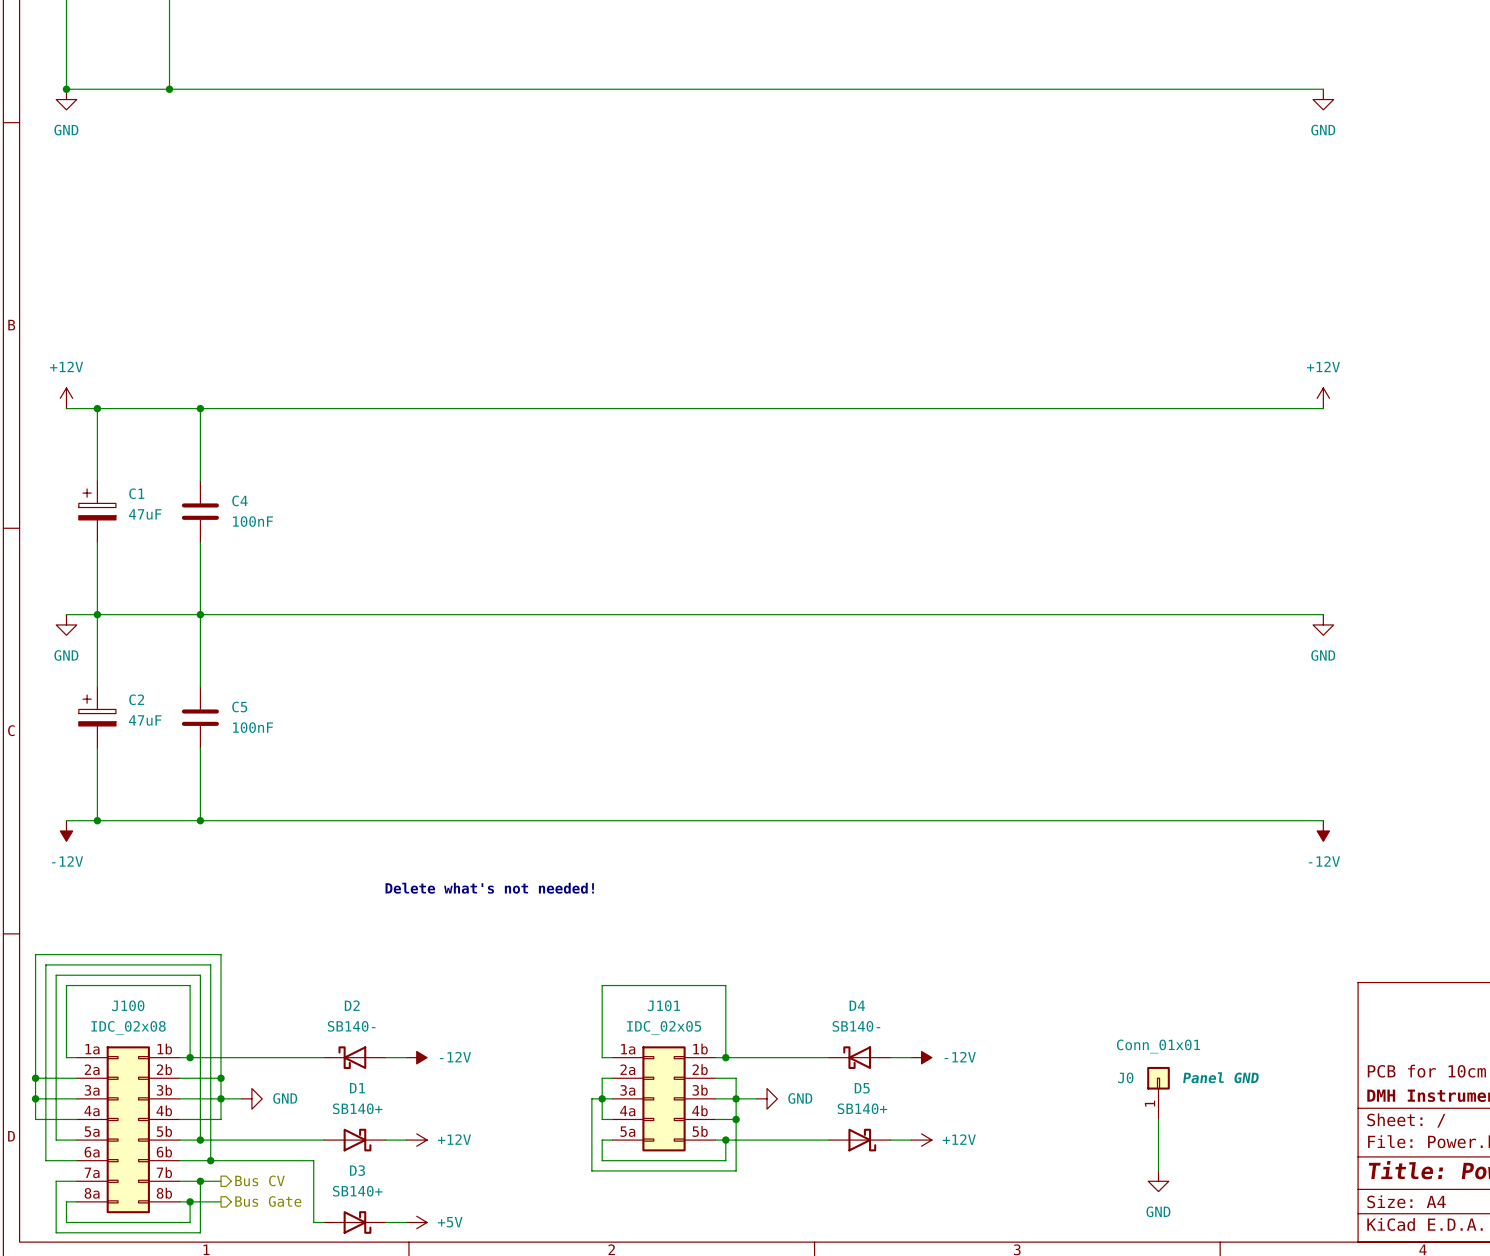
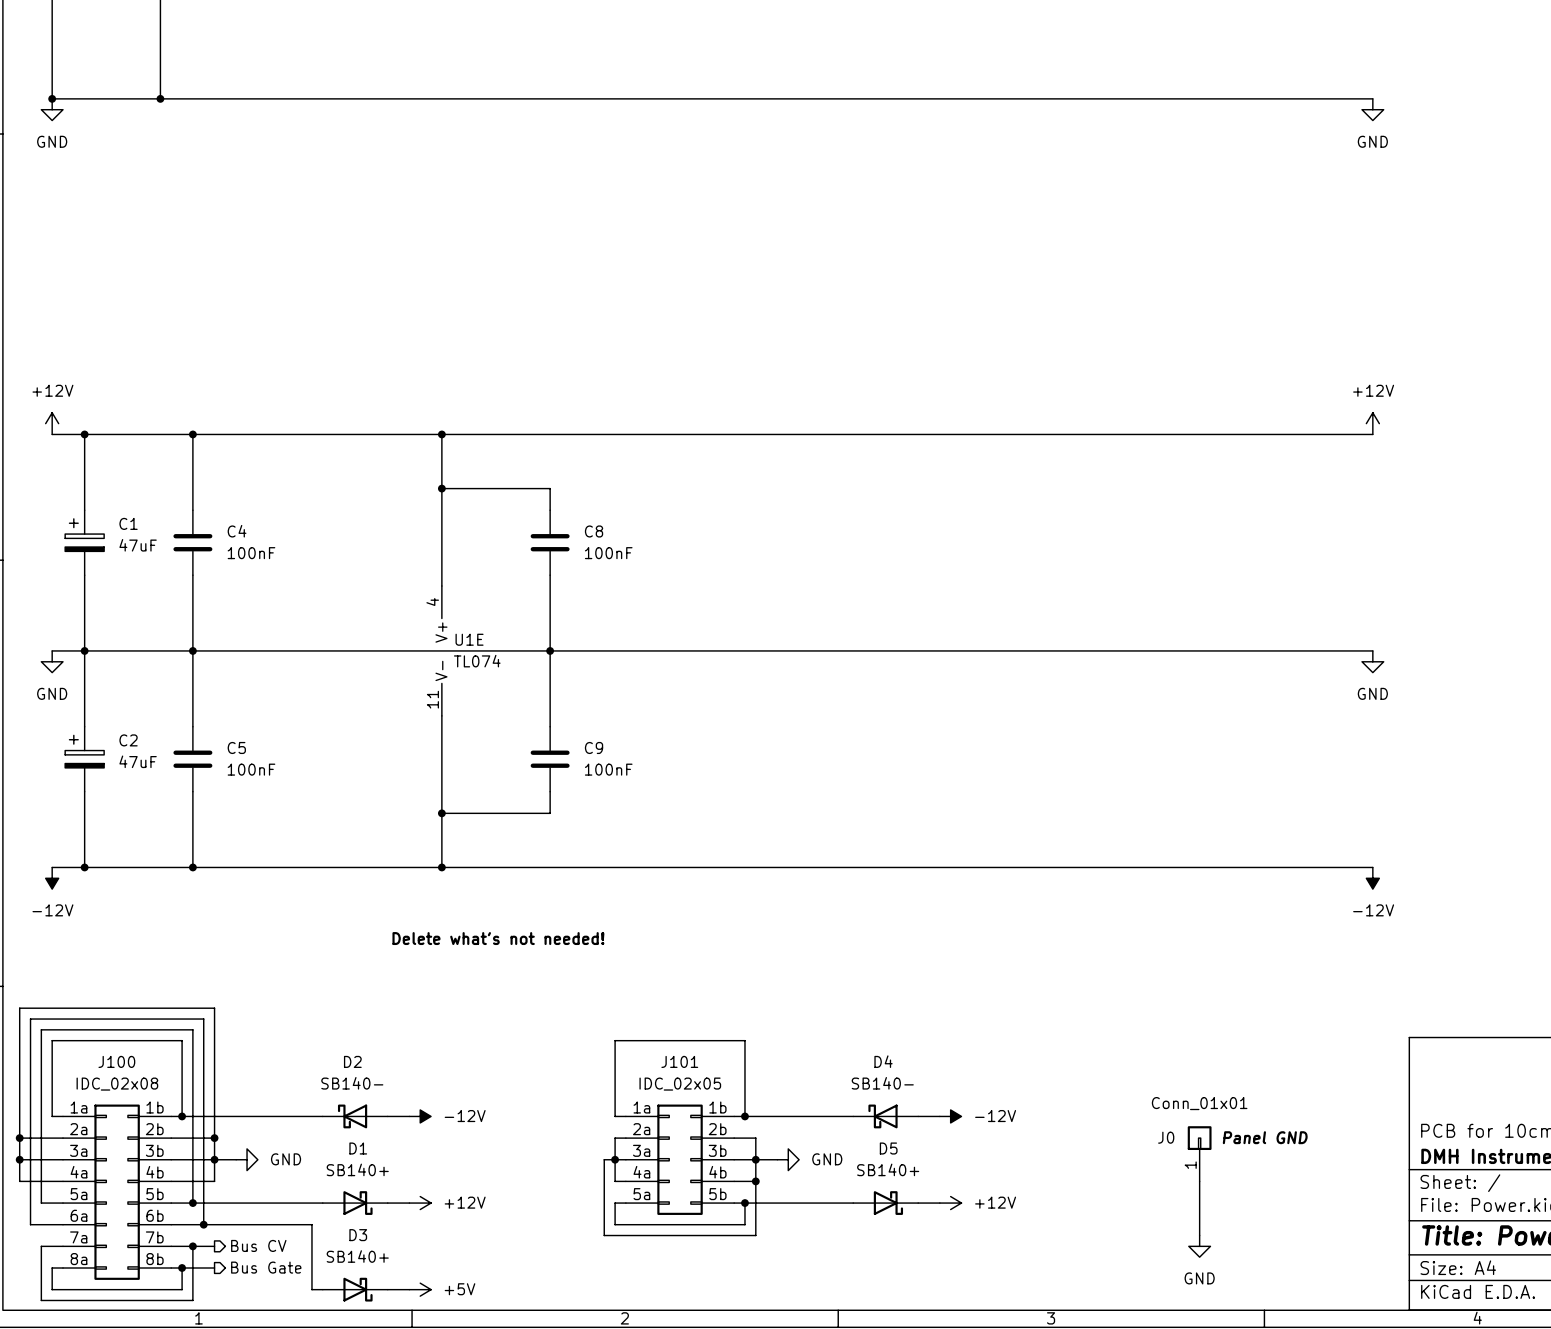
wire: none -> (441, 434) (441, 586)
junction: none -> (441, 434)
wire: none -> (441, 488) (550, 488) (550, 510)
junction: none -> (441, 488)
C8: none -> 100nF (550, 542)
wire: none -> (550, 575) (550, 726)
U1E: none -> TL074 (441, 650)
junction: none -> (550, 650)
wire: none -> (441, 715) (441, 867)
C9: none -> 100nF (550, 759)
wire: none -> (550, 791) (550, 813) (441, 813)
junction: none -> (441, 813)
junction: none -> (441, 867)

